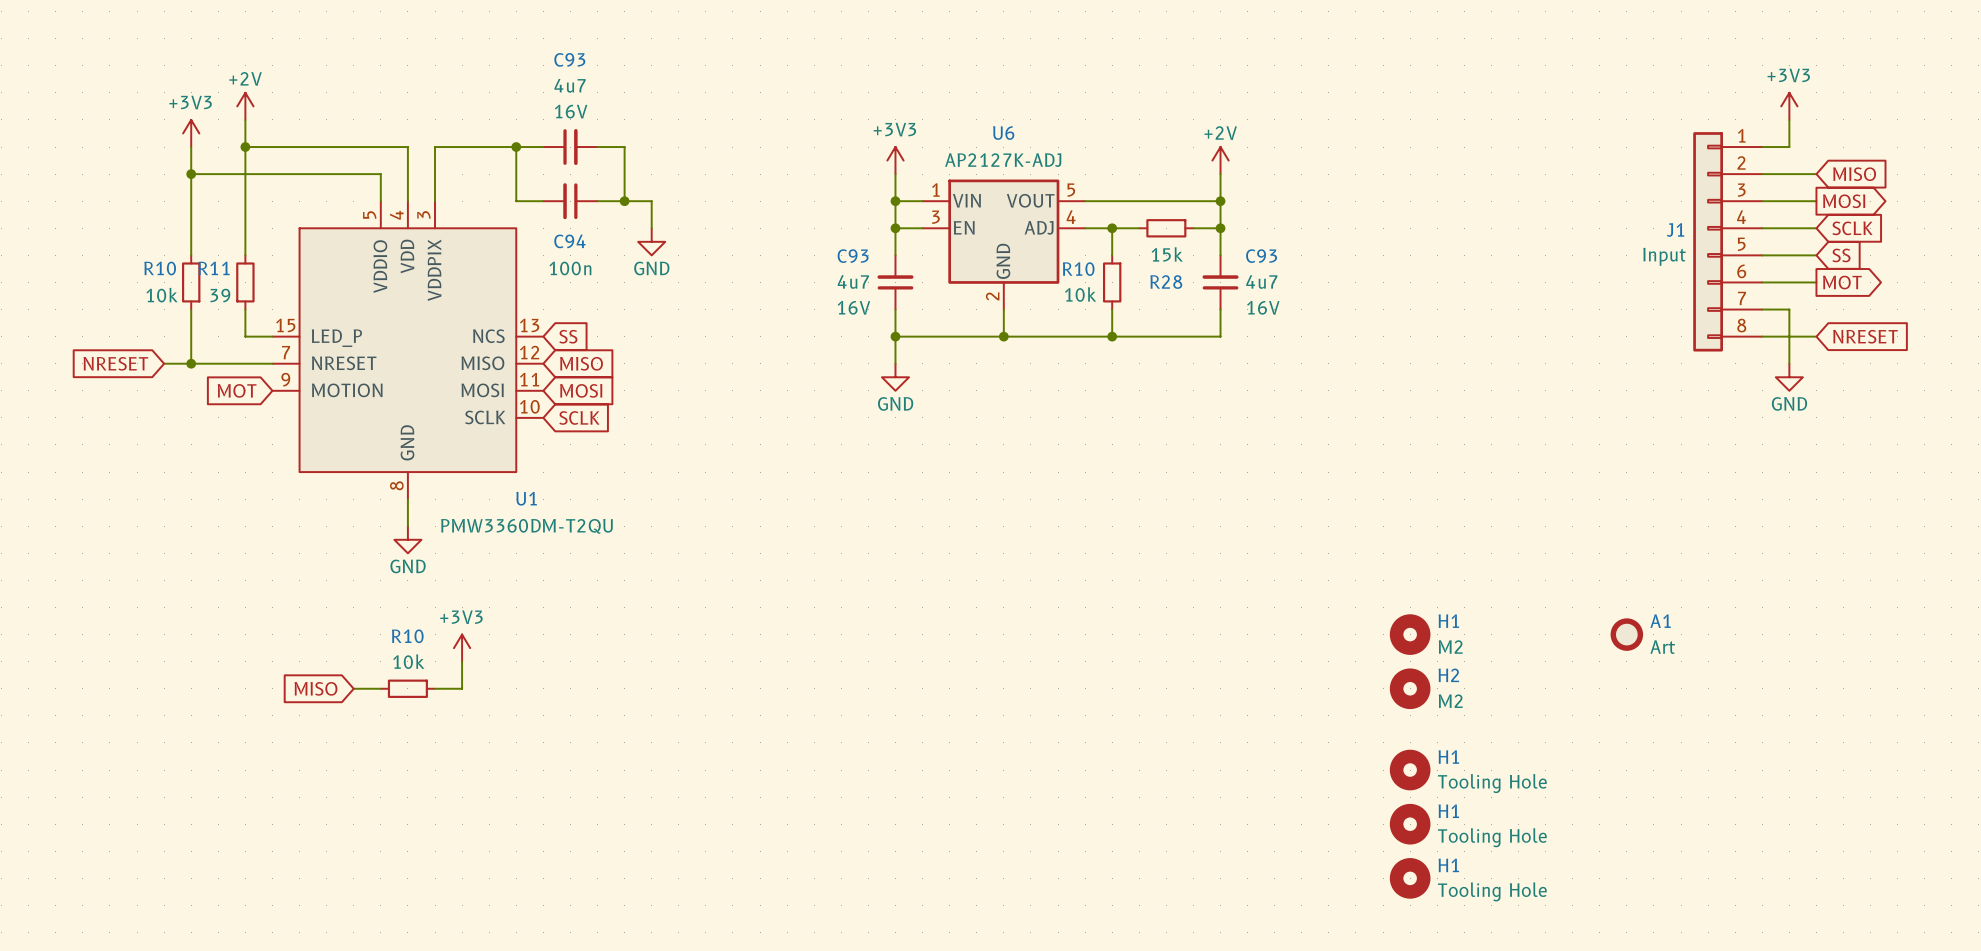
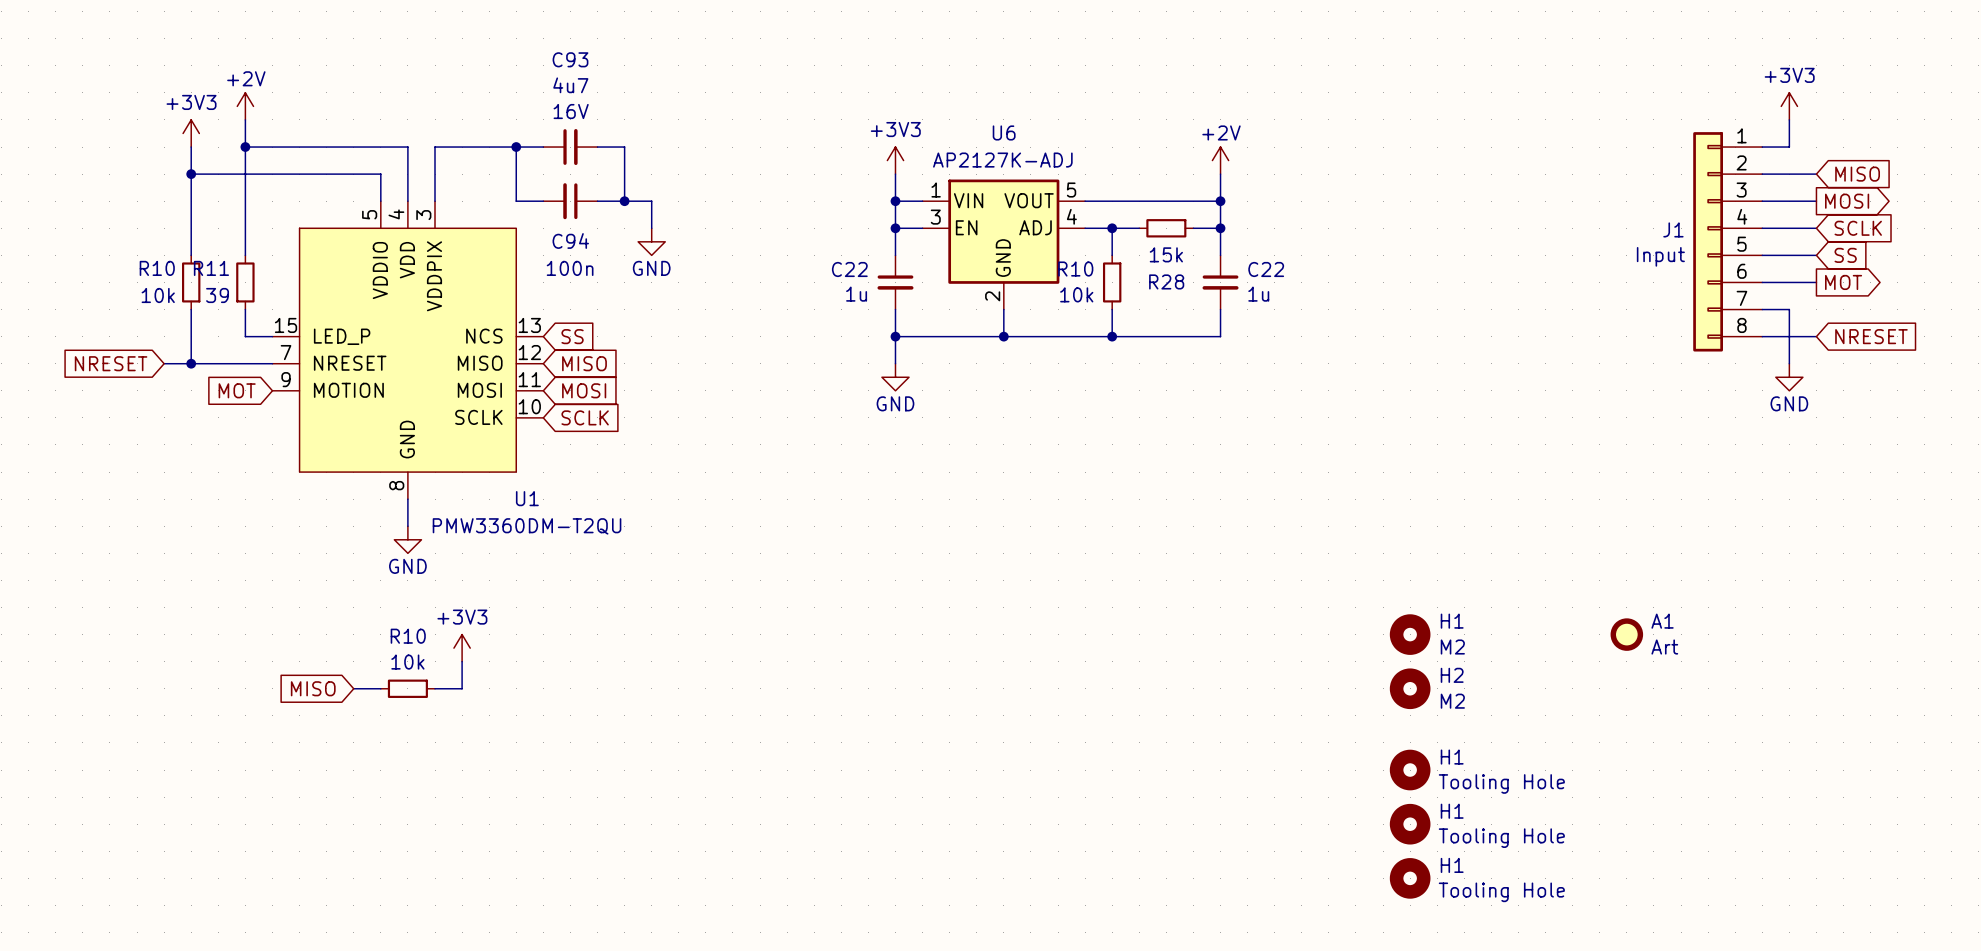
C93: 4u7 (895, 282) -> none
C22: none -> 1u (895, 282)
C93: 4u7 (1220, 282) -> none
C22: none -> 1u (1220, 282)

